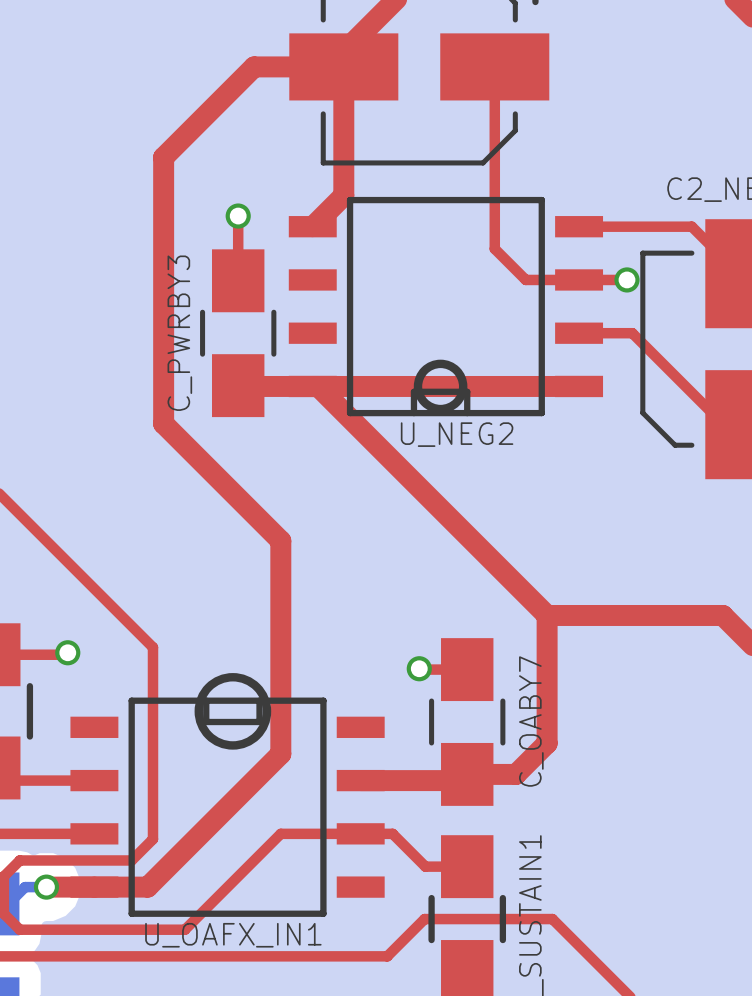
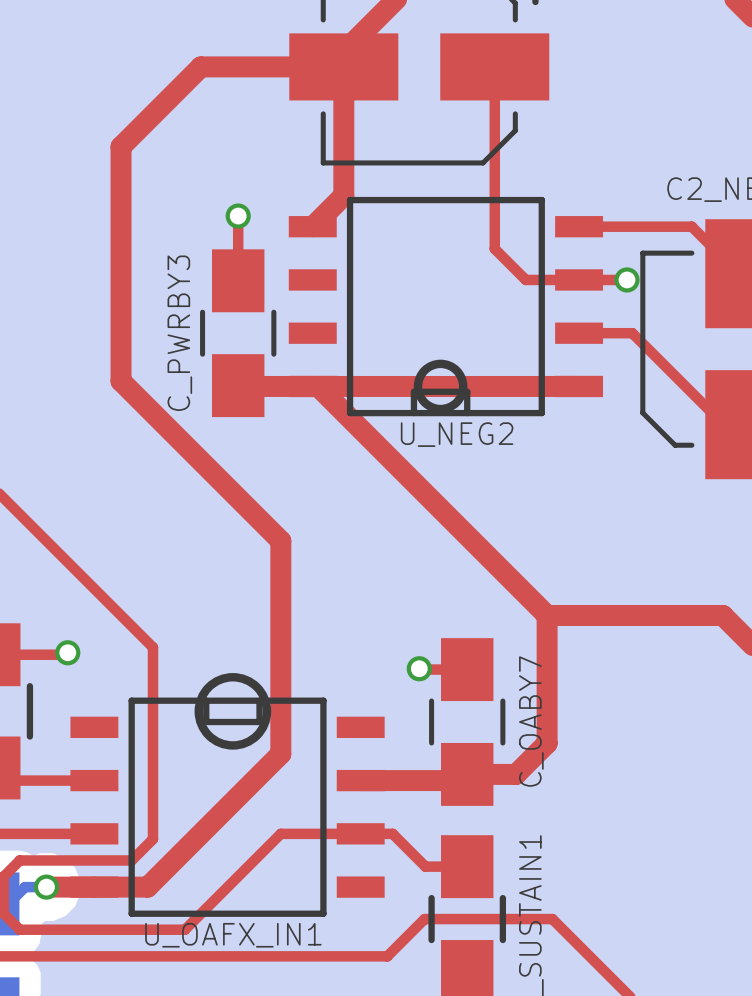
top track: (254, 66) (163, 157) (163, 423) -> (254, 66) (200, 66) (121, 146) (121, 381) (163, 423)

